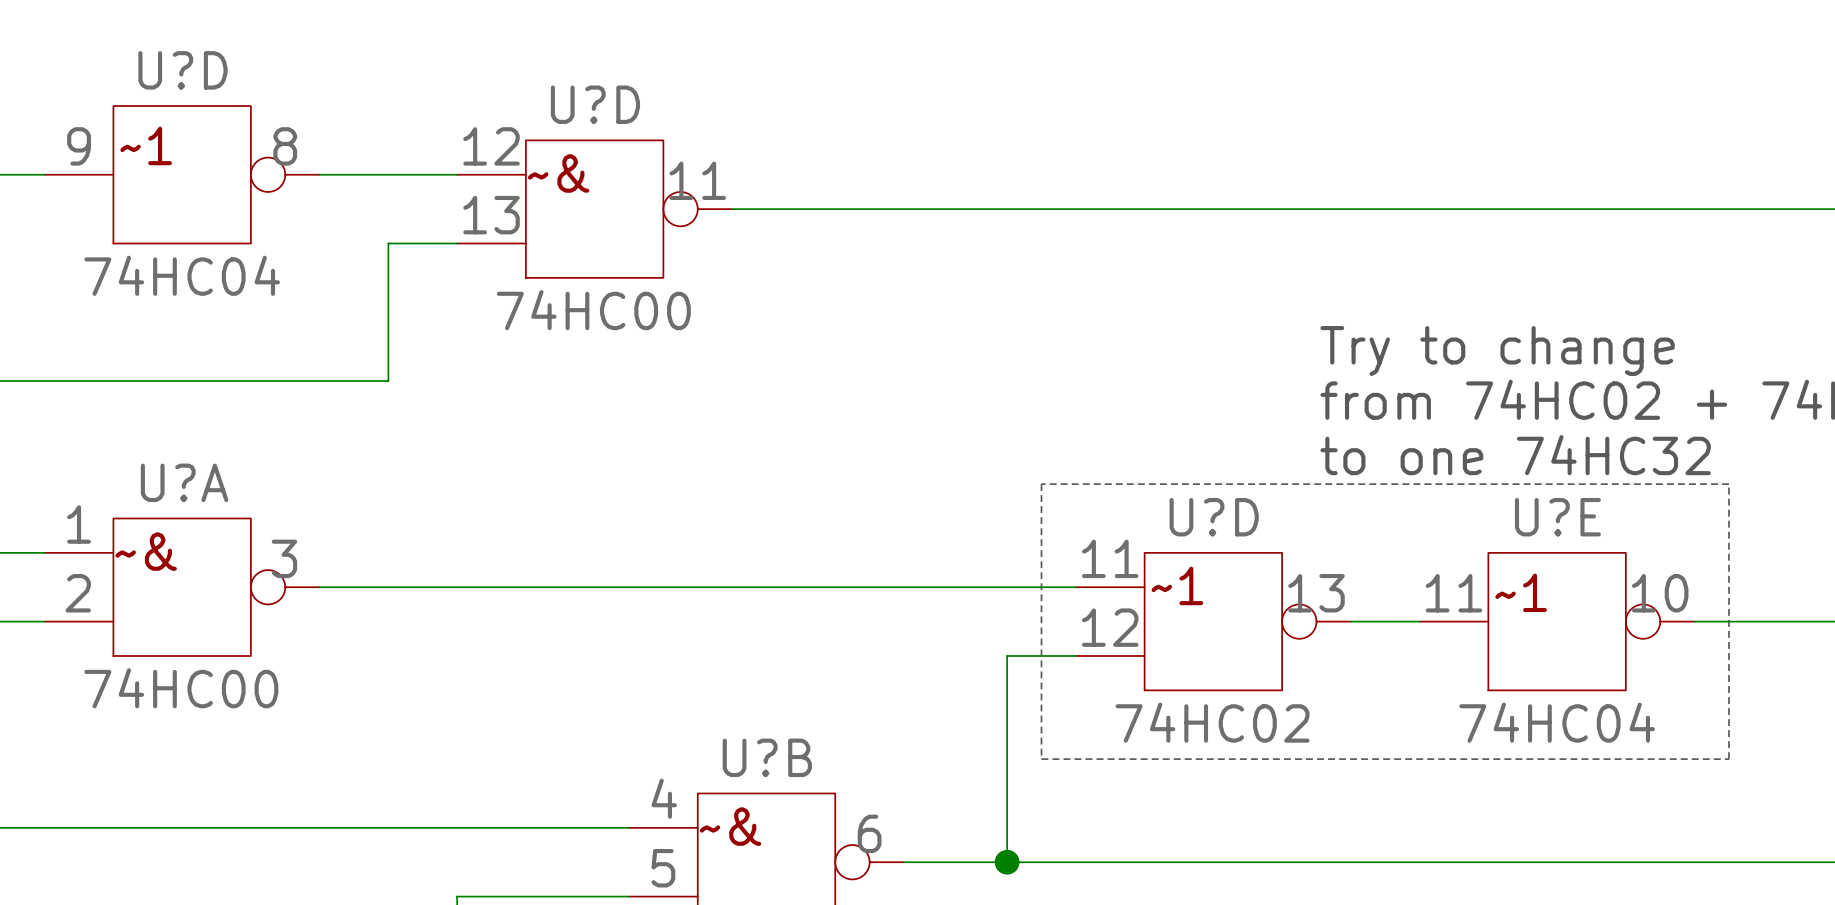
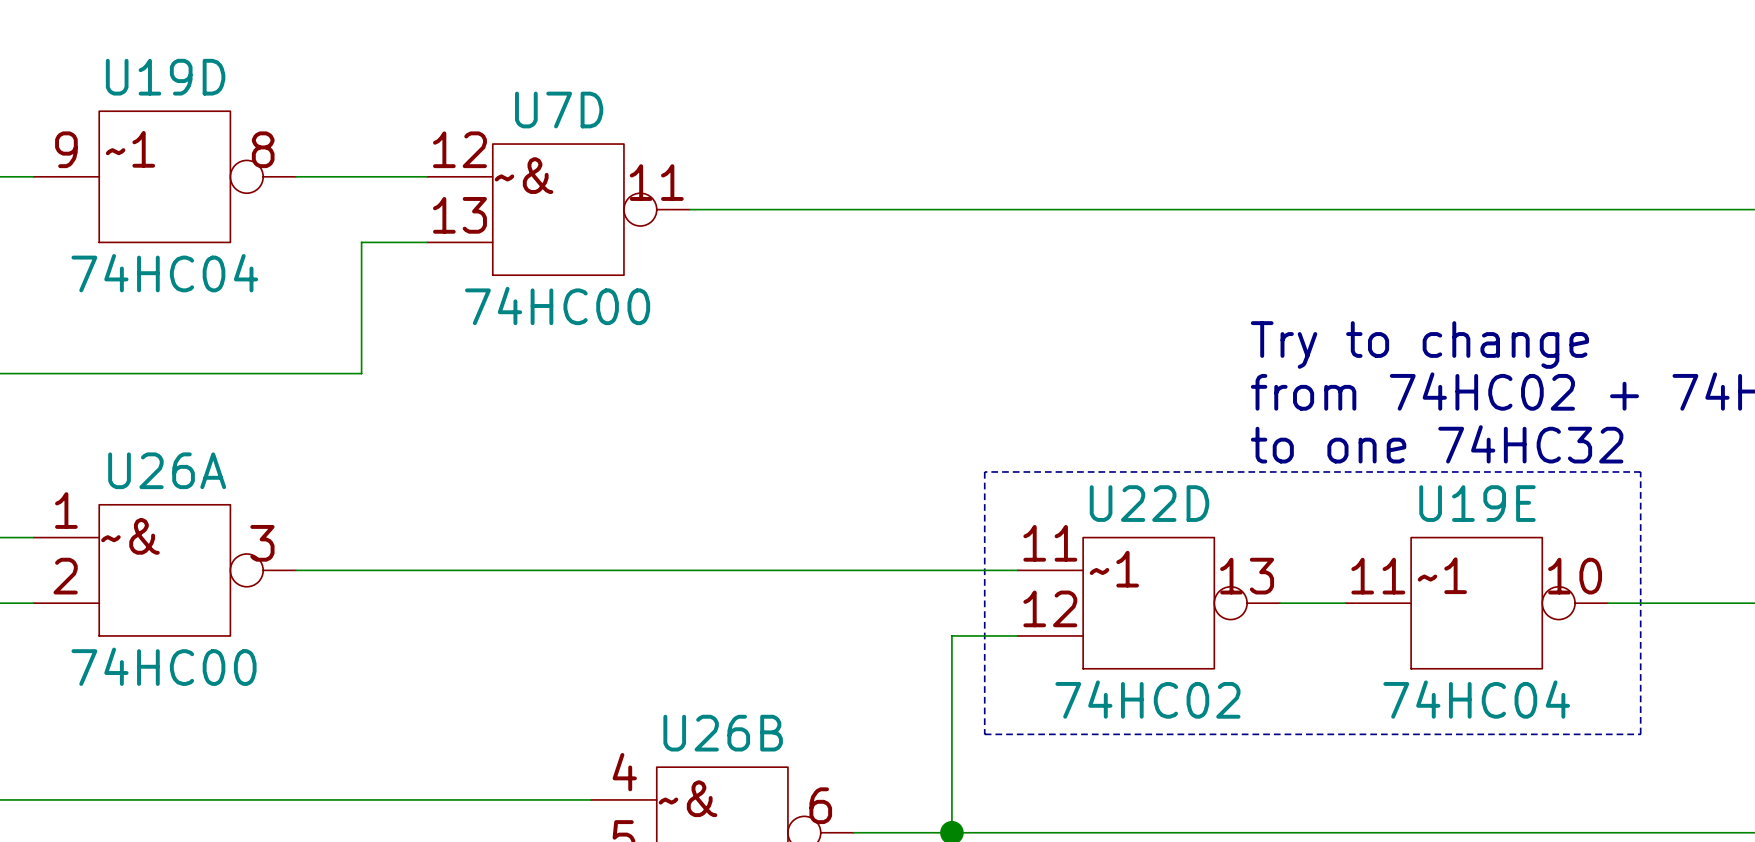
U?D name: U?D (182, 70) -> U19D (165, 77)
U?D name: U?D (595, 104) -> U7D (559, 109)
U?A name: U?A (184, 482) -> U26A (167, 470)
U?D name: U?D (1214, 517) -> U22D (1149, 503)
U?E name: U?E (1557, 517) -> U19E (1477, 503)
U?B name: U?B (767, 757) -> U26B (723, 733)

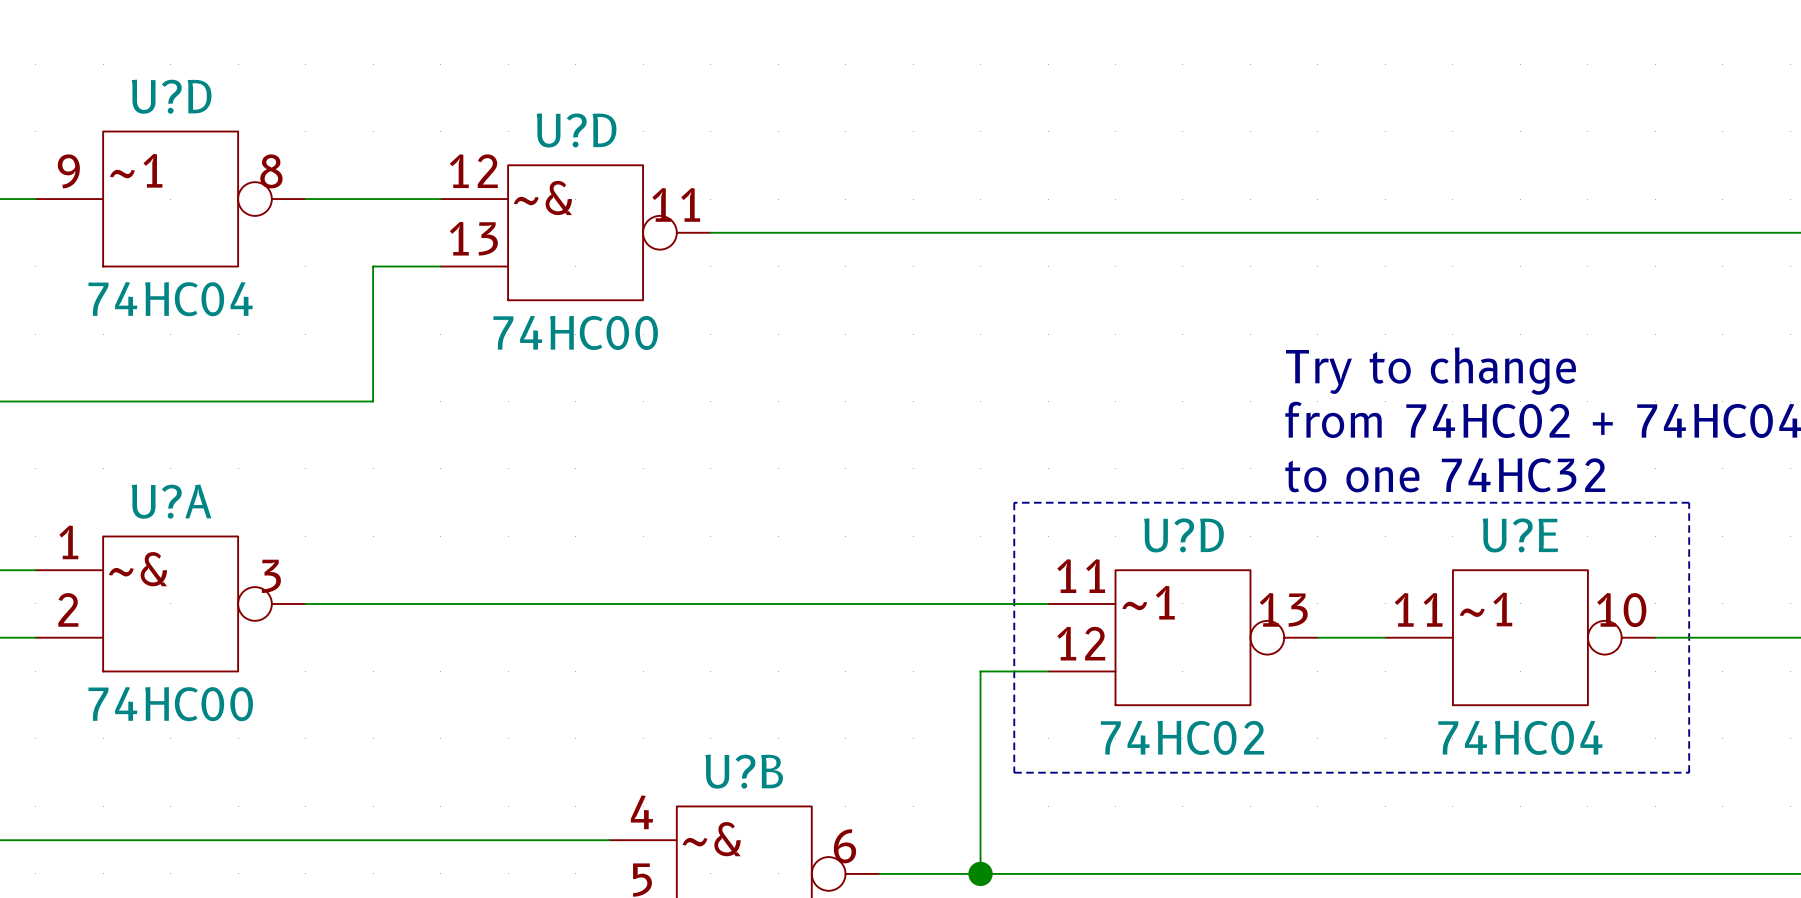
U19D name: U19D (165, 77) -> U?D (171, 96)
U7D name: U7D (559, 109) -> U?D (576, 130)
U26A name: U26A (167, 470) -> U?A (171, 501)
U22D name: U22D (1149, 503) -> U?D (1183, 535)
U19E name: U19E (1477, 503) -> U?E (1520, 535)
U26B name: U26B (723, 733) -> U?B (744, 771)

